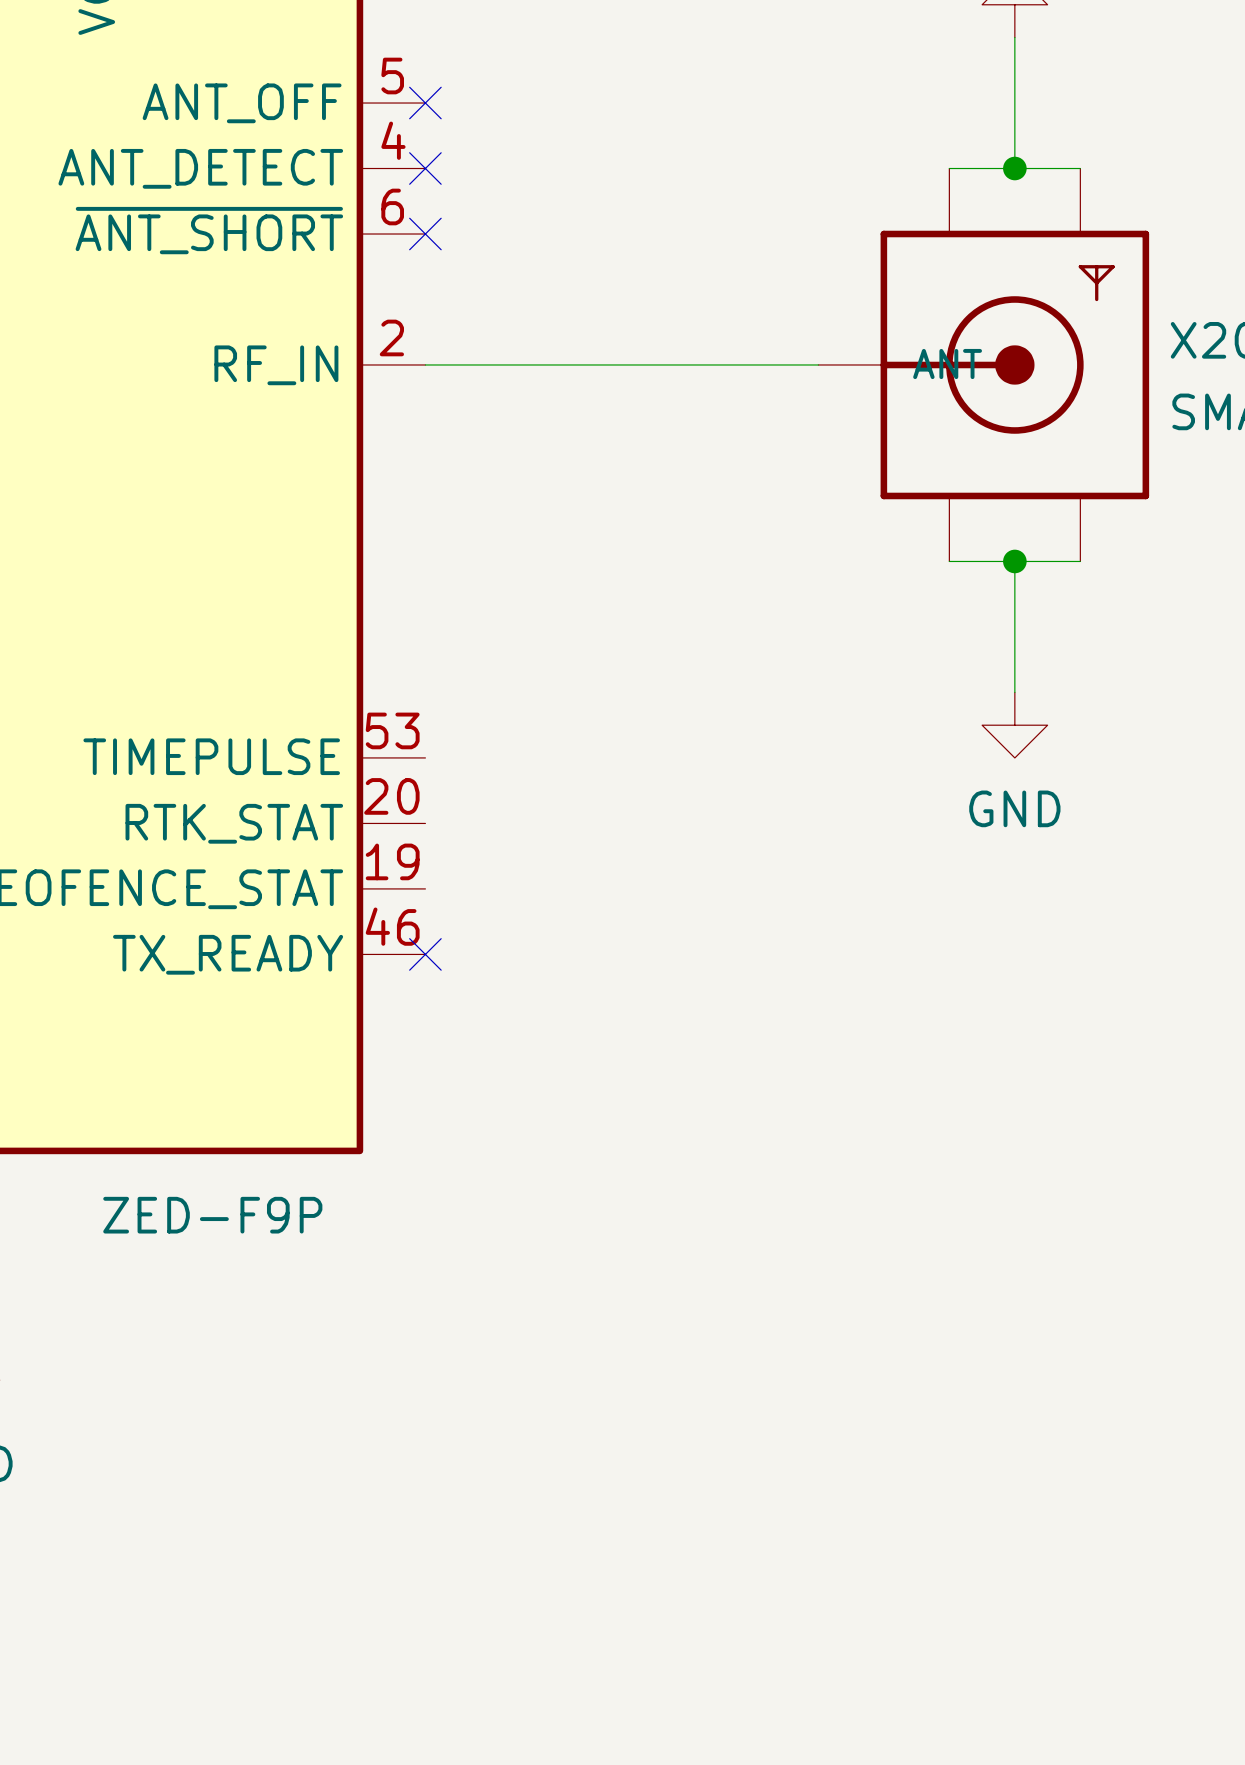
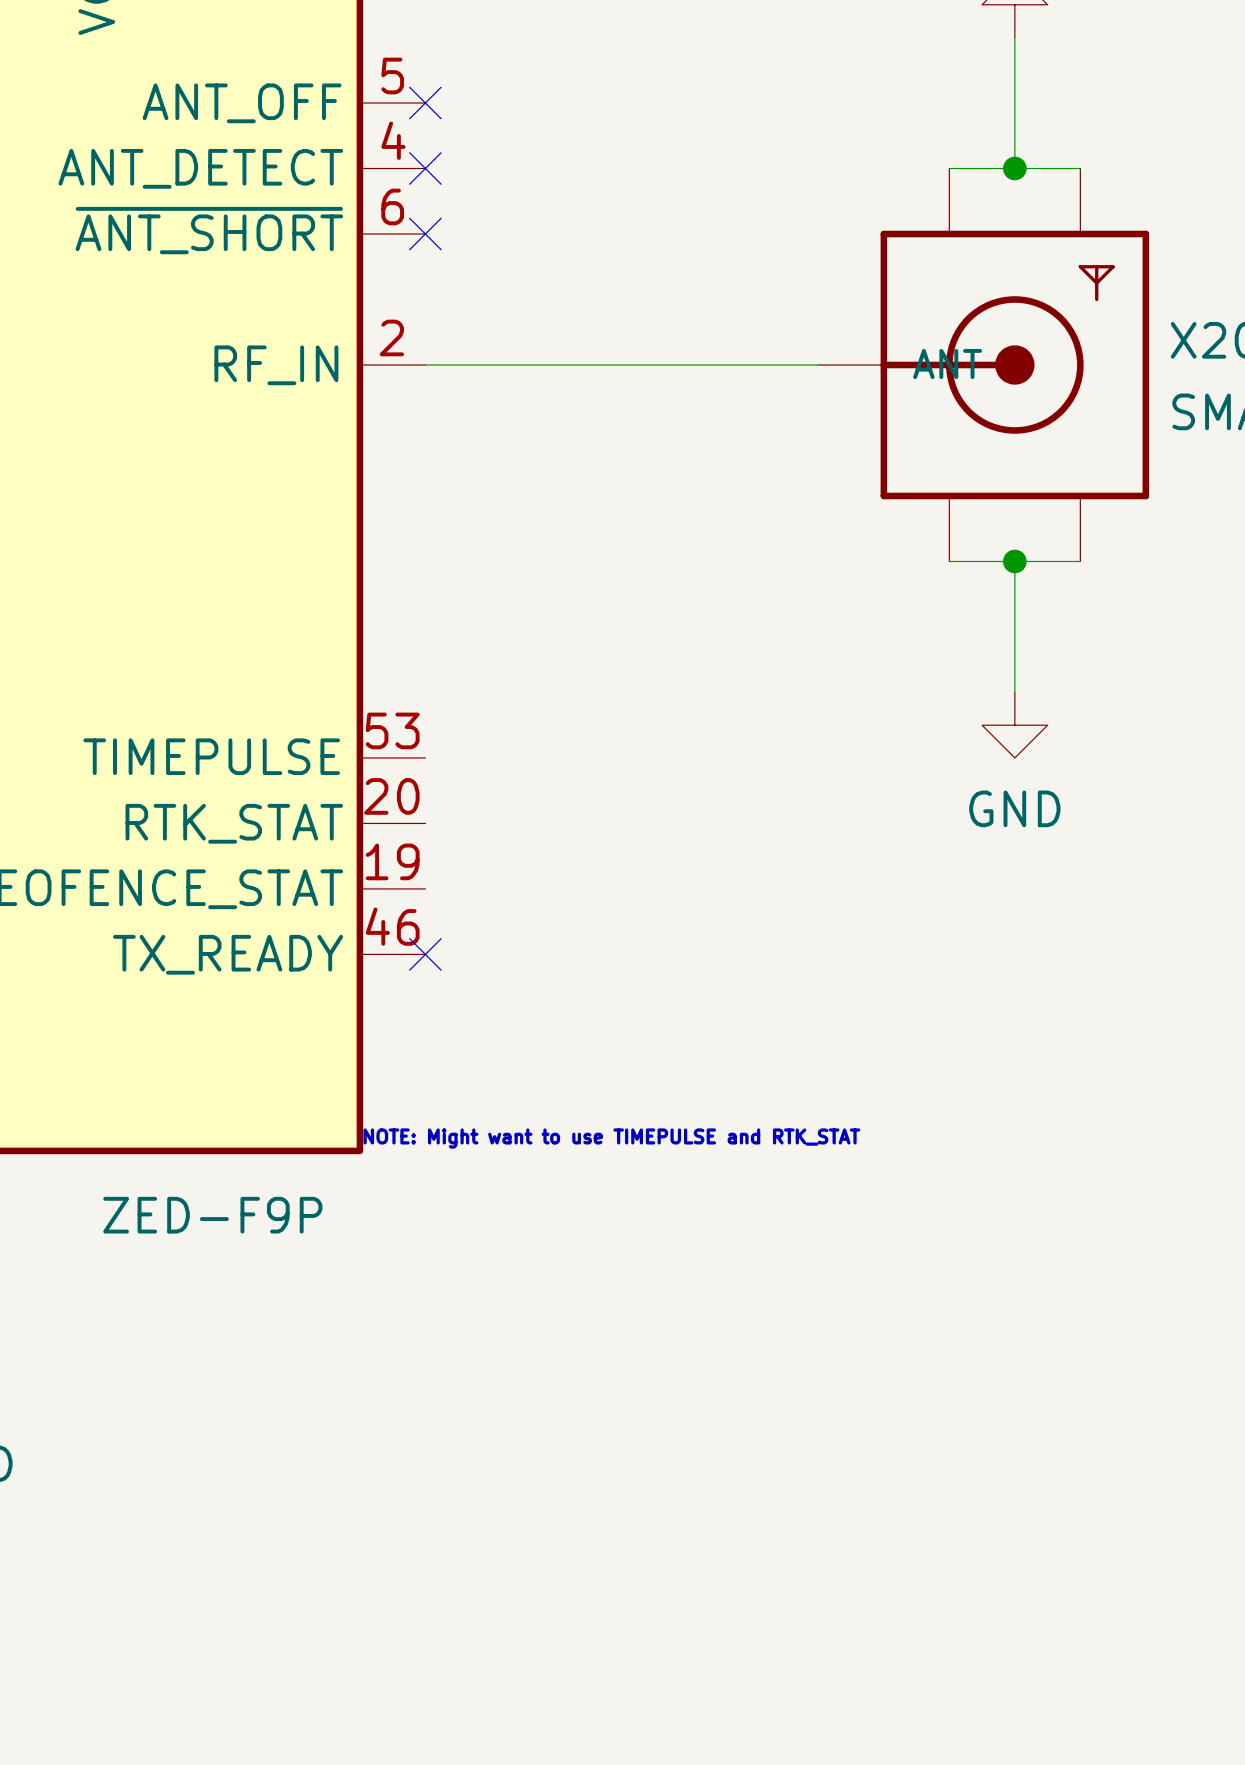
text: none -> NOTE: Might want to use TIMEPULSE and RTK_STAT (611, 1138)

